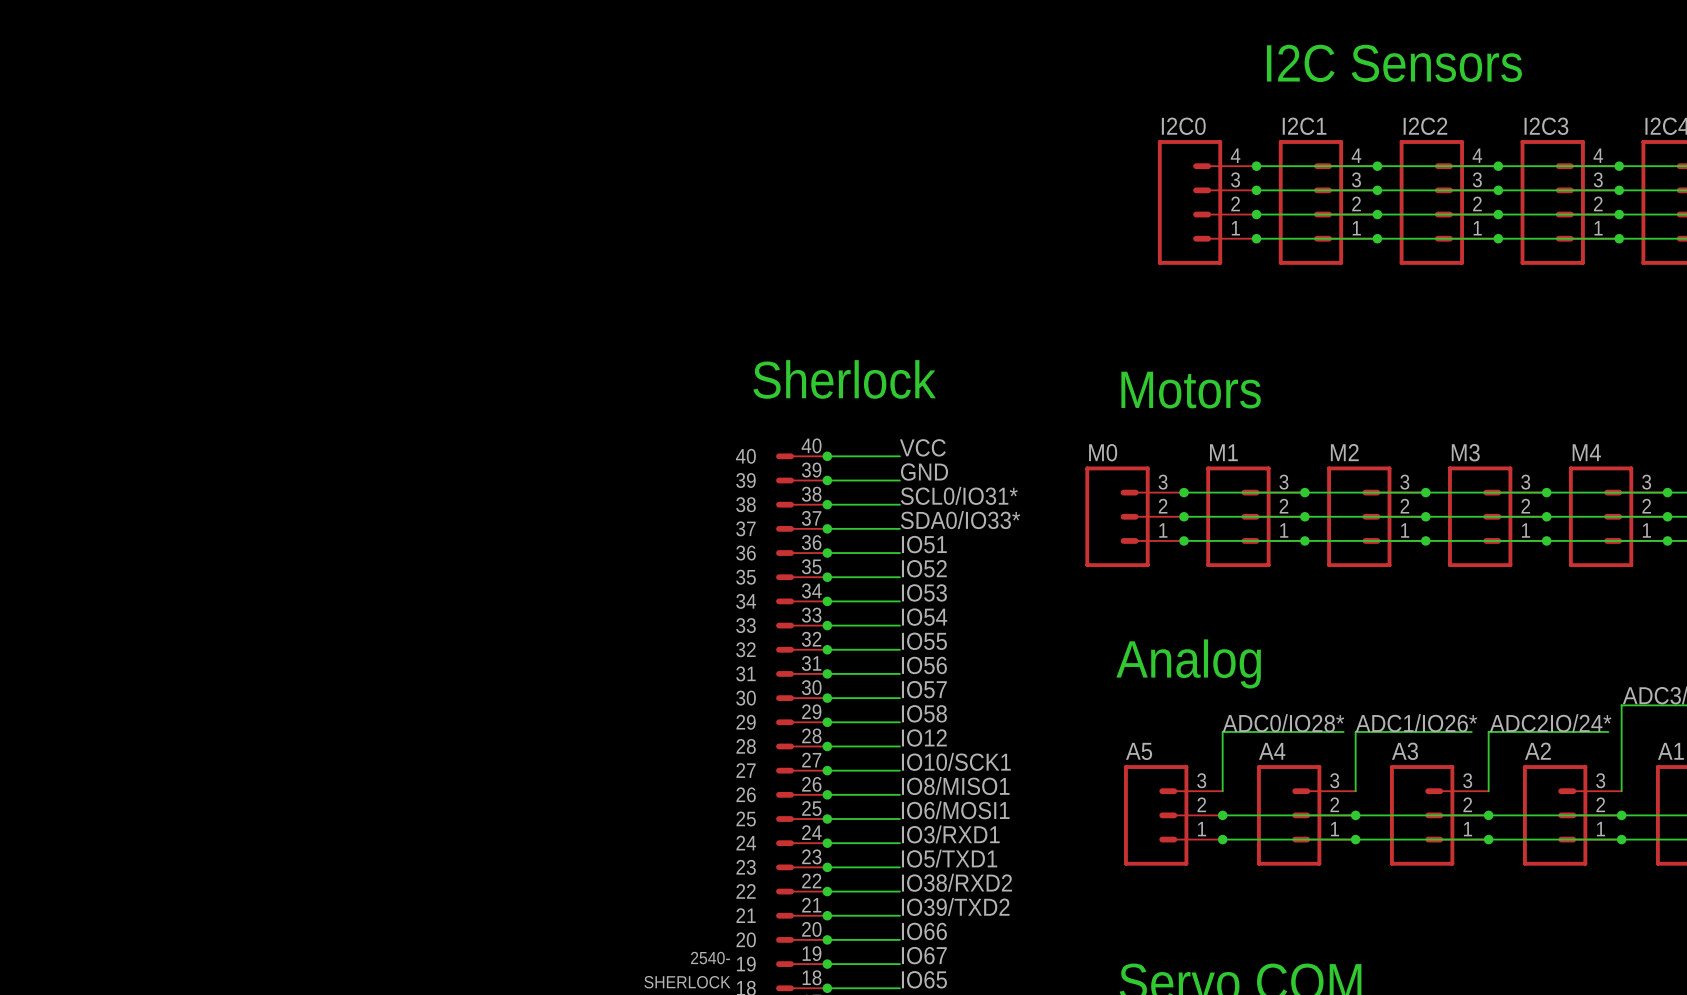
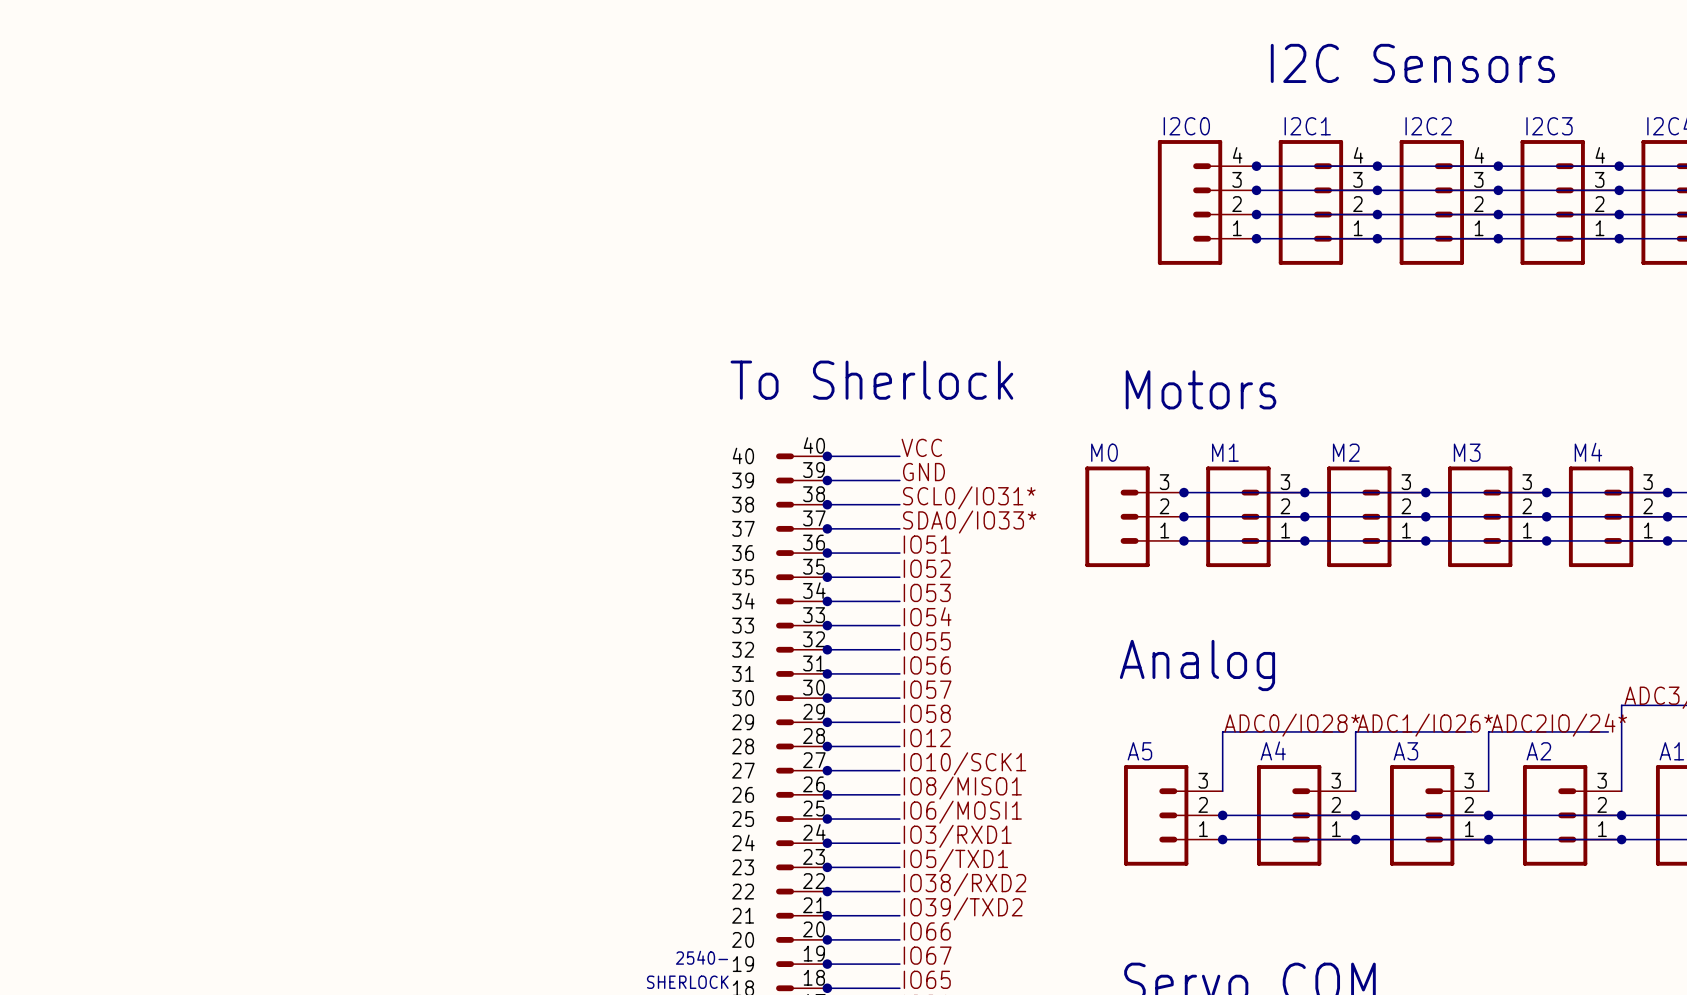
text: Sherlock (844, 379) -> To Sherlock (871, 380)

